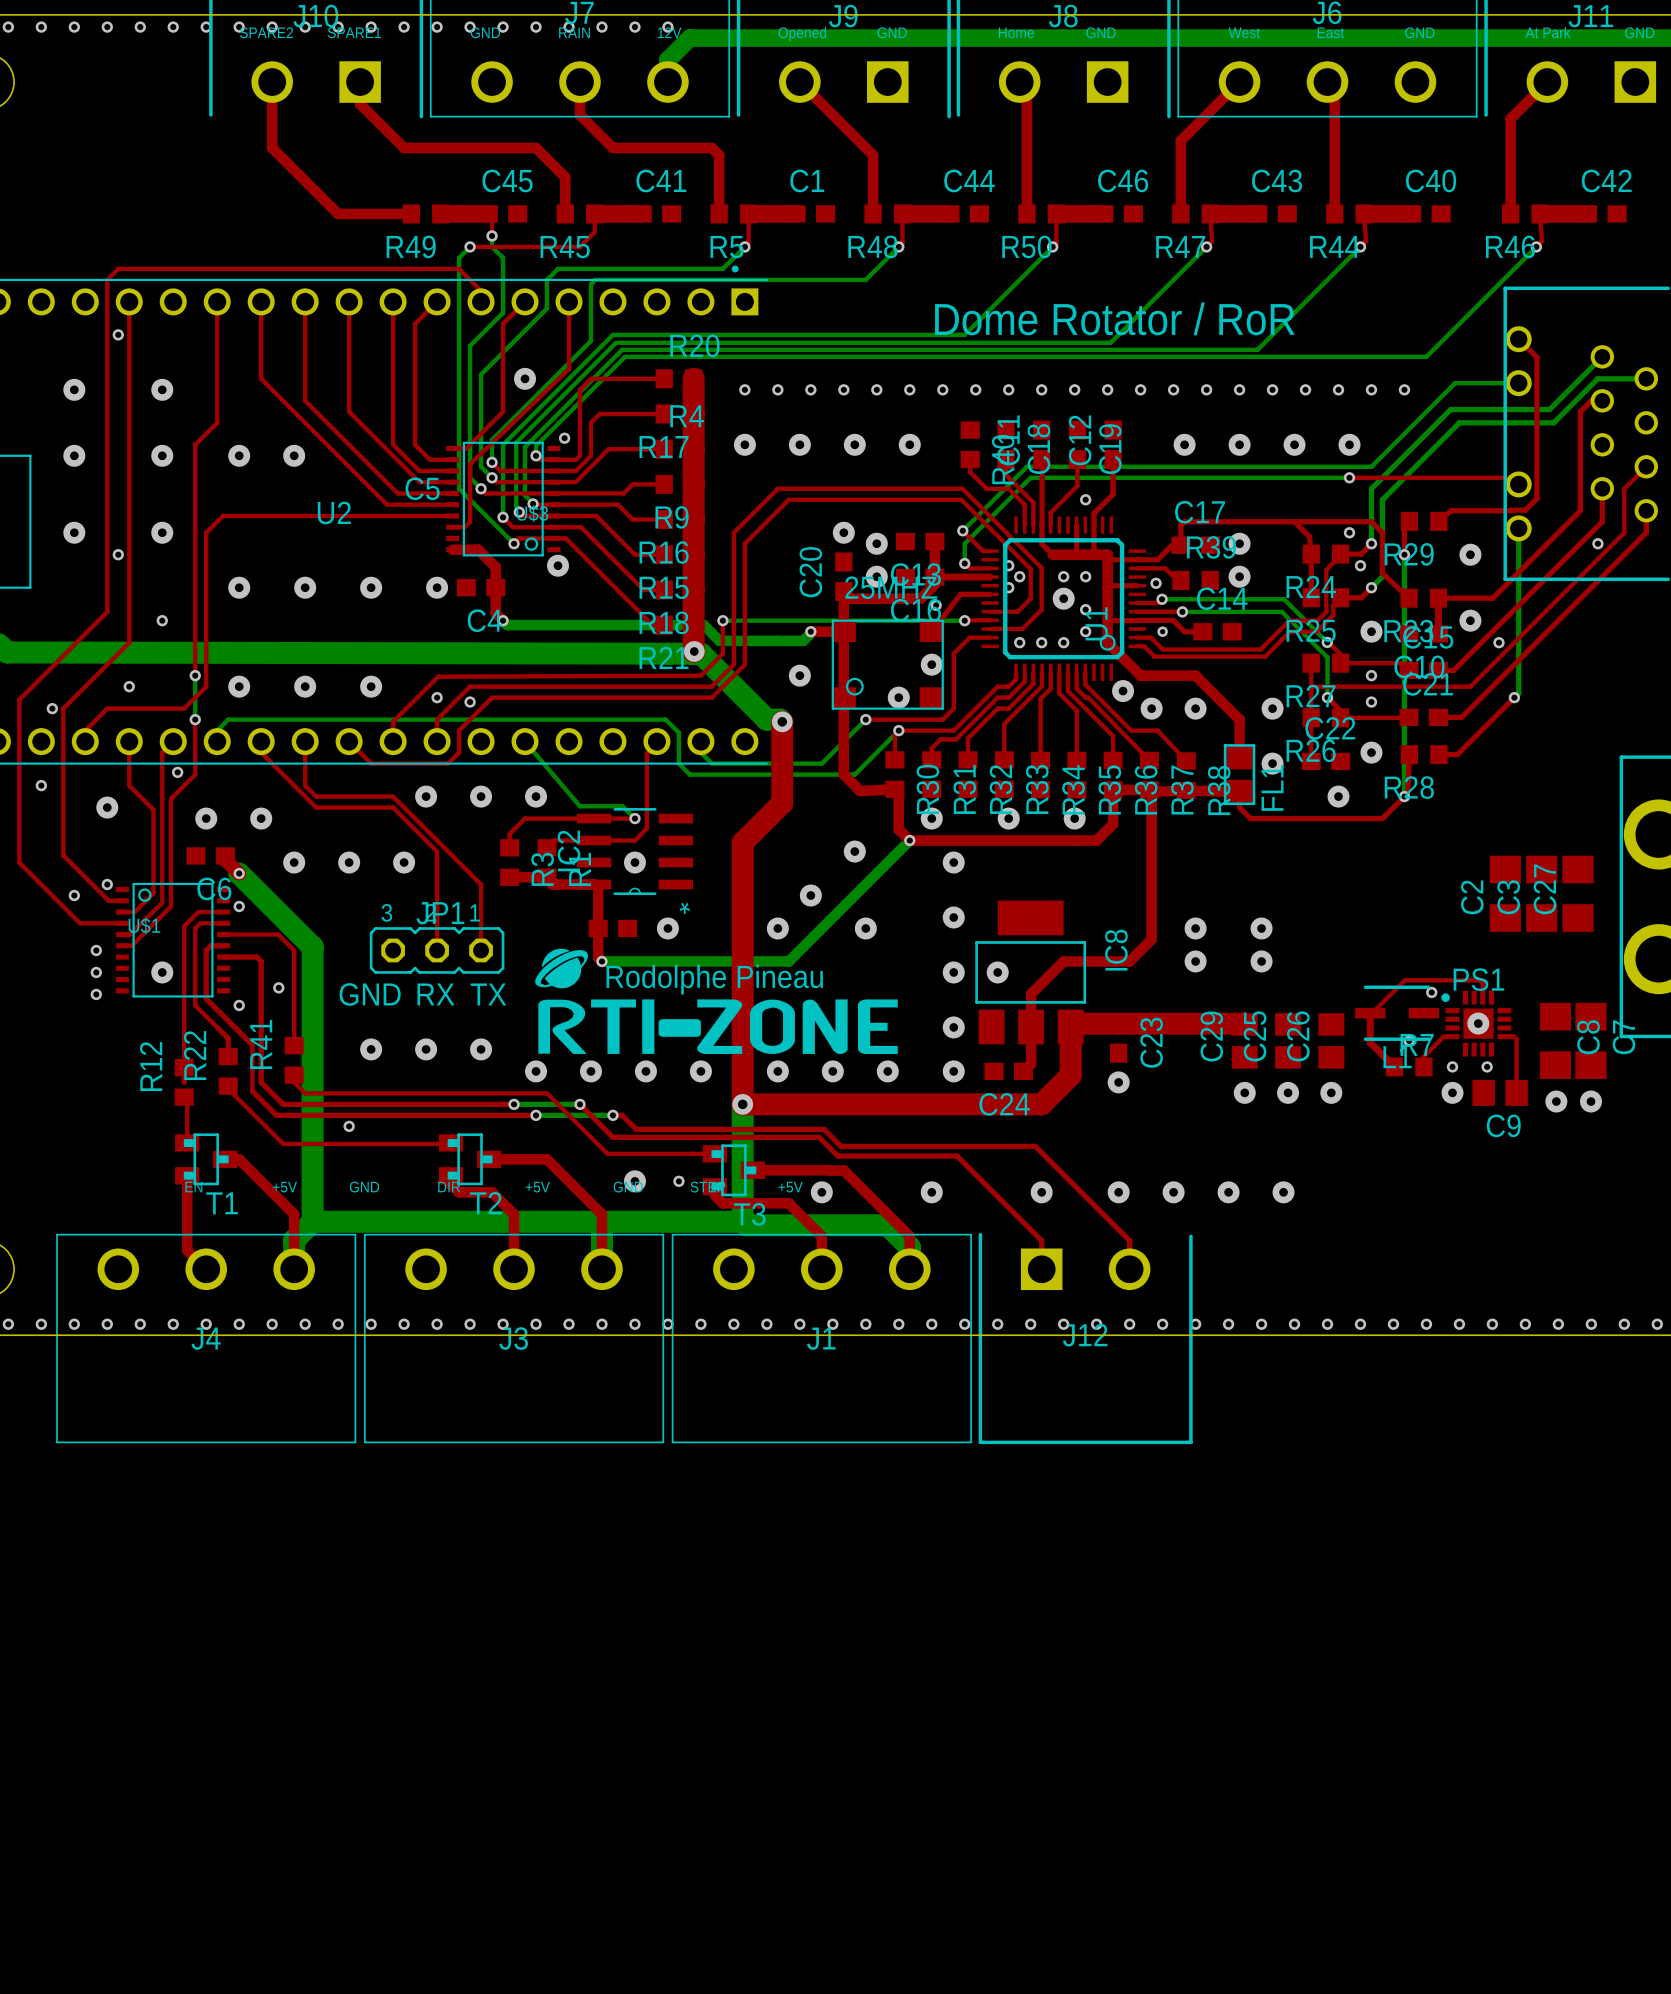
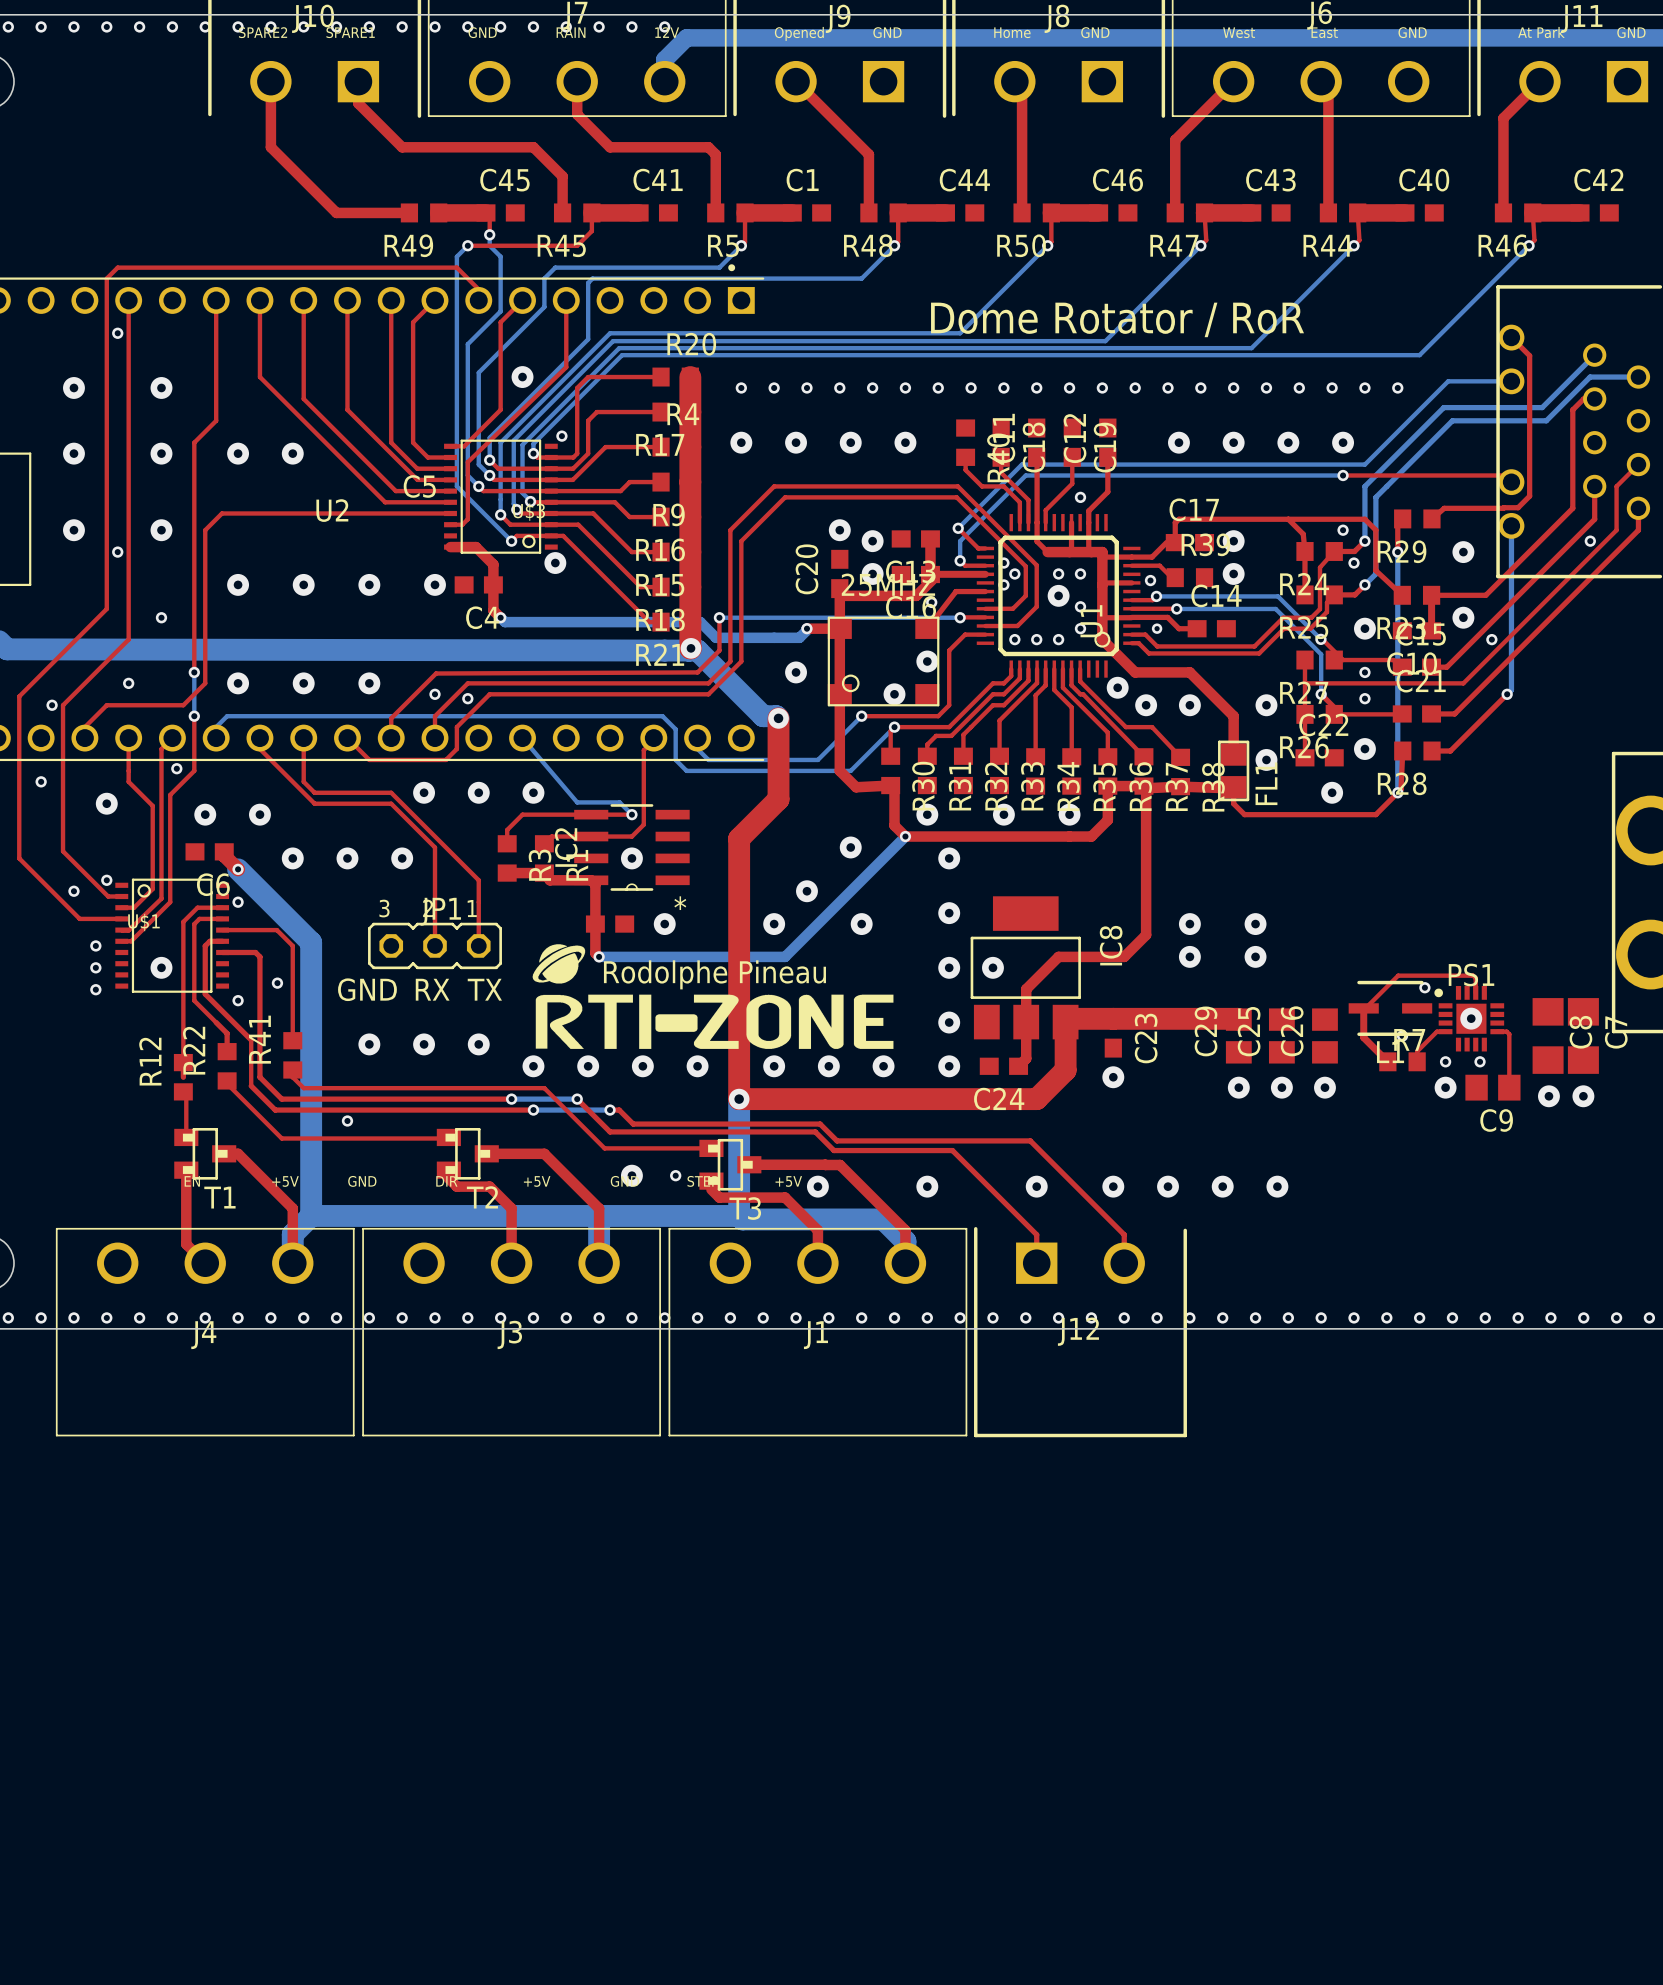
C2: (1505, 893) -> none
C3: (1541, 893) -> none
C27: (1578, 893) -> none

